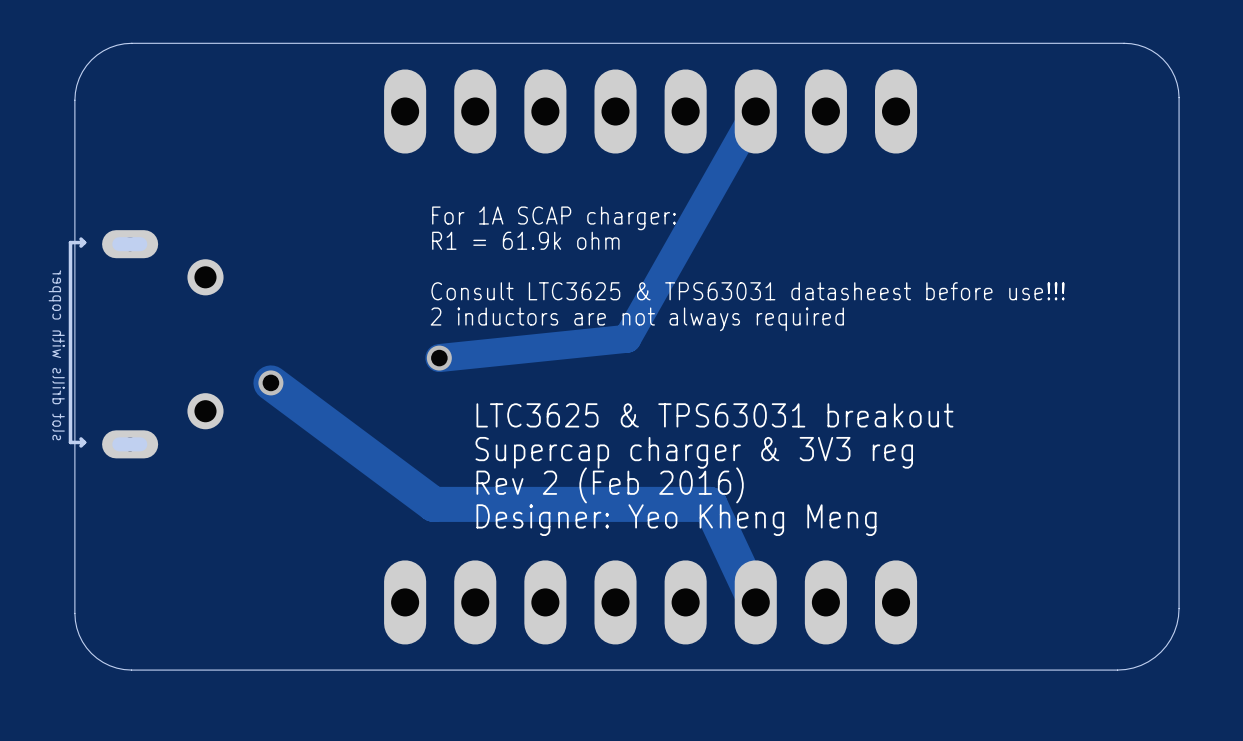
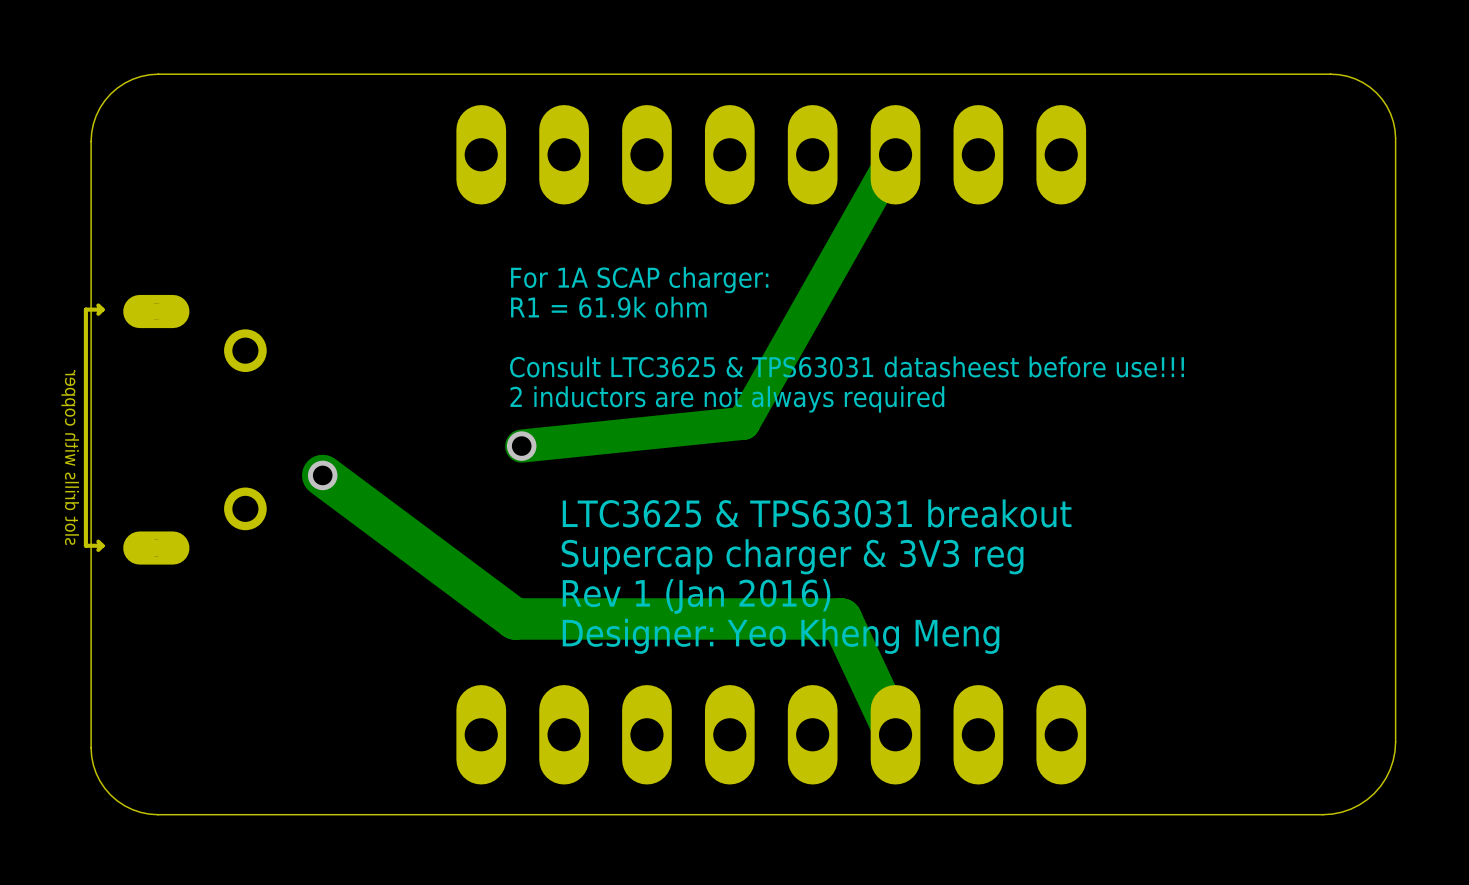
text: Rev 2 (Feb 2016) (610, 485) -> Rev 1 (Jan 2016) (696, 596)

